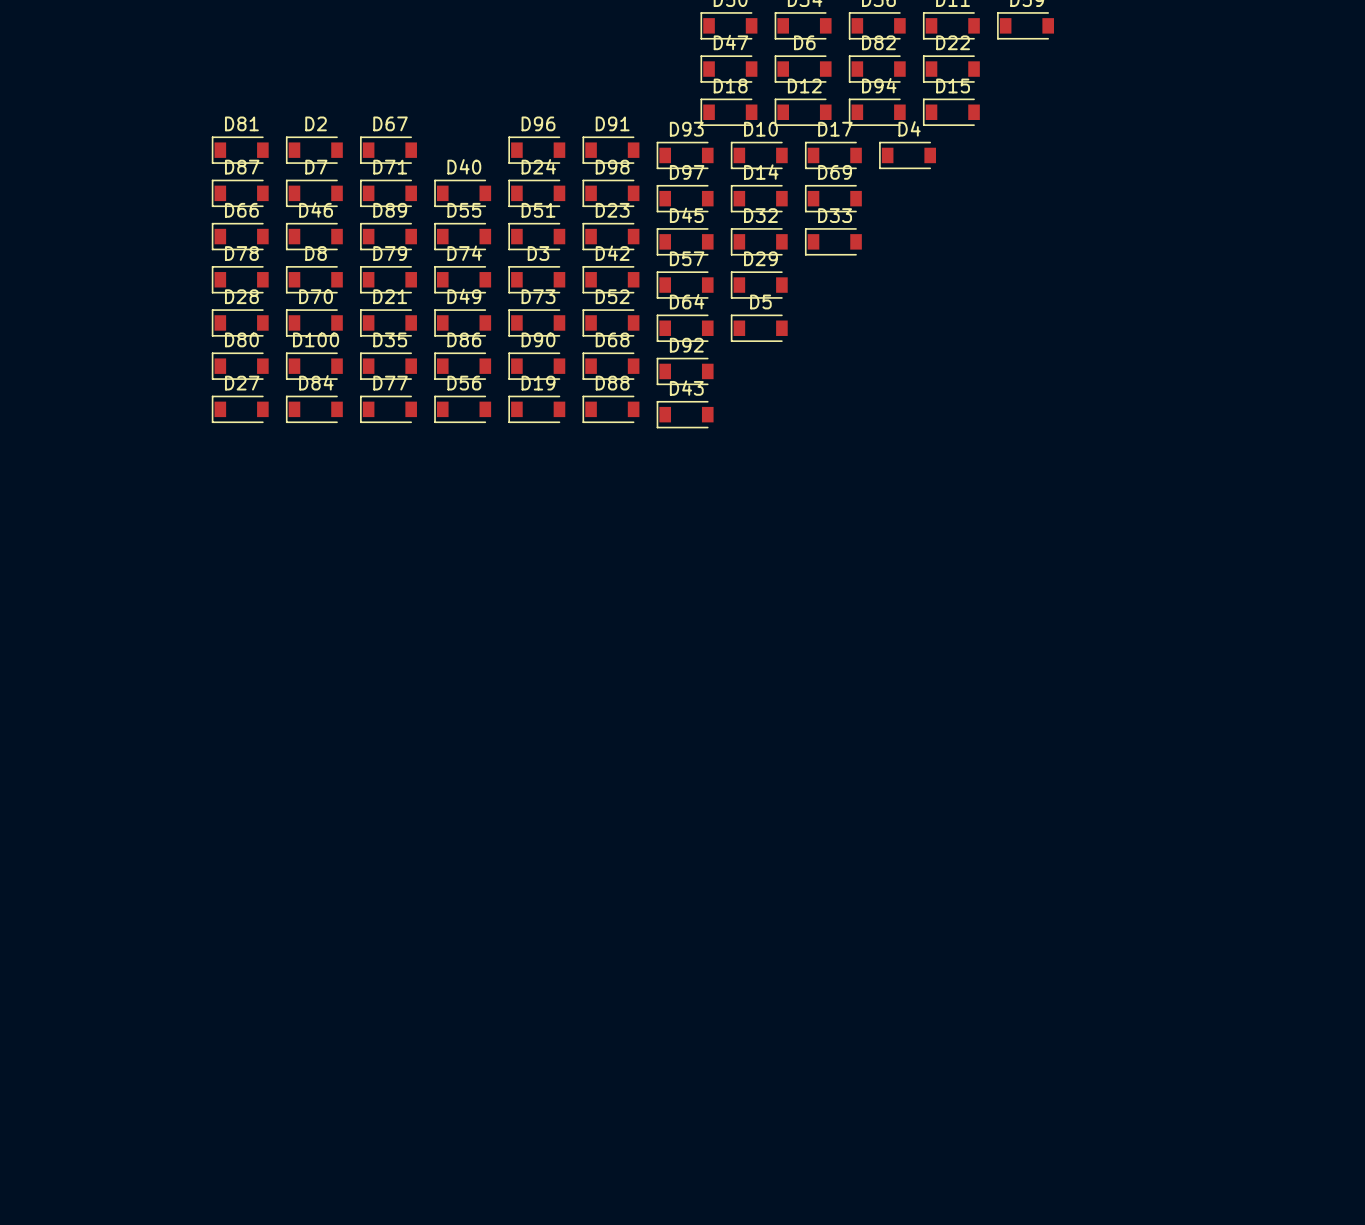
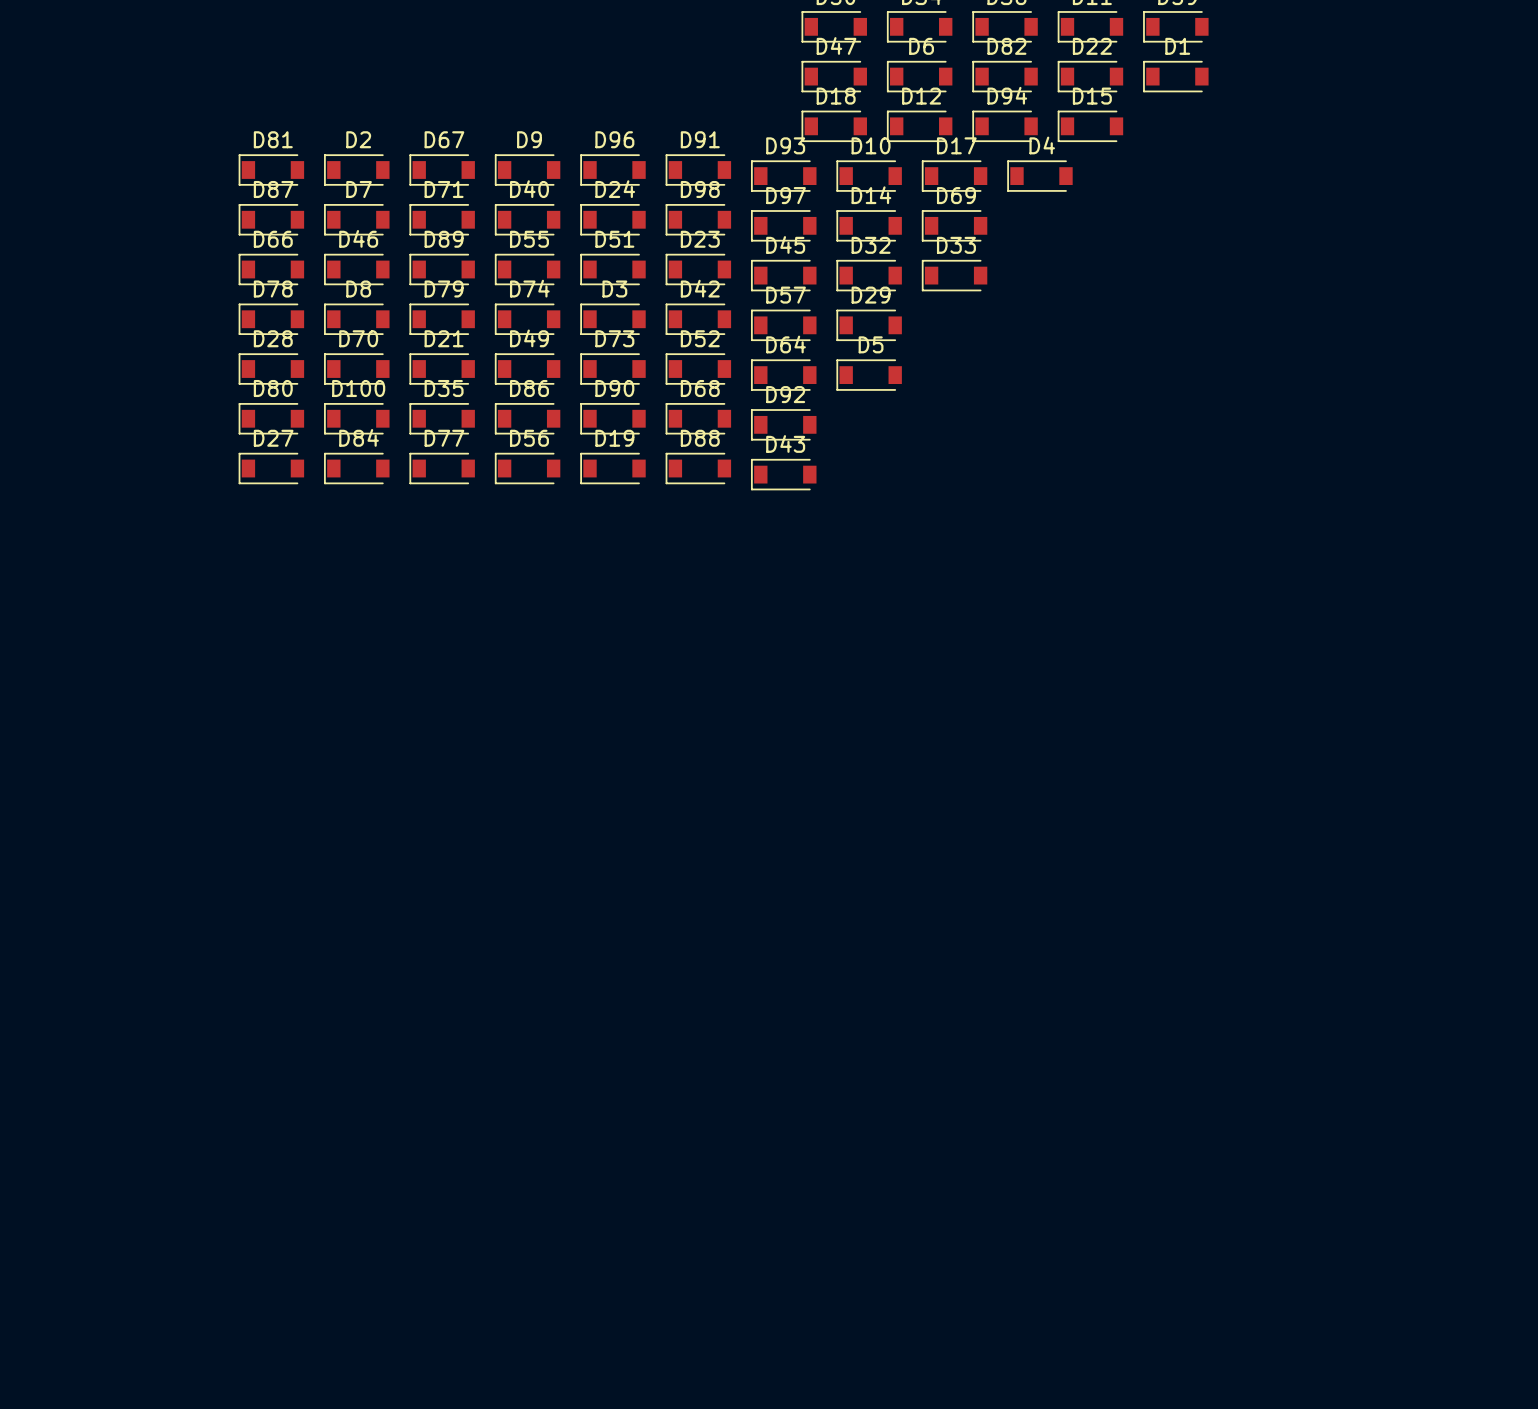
D1: none -> (1175, 76)
D9: none -> (527, 170)

